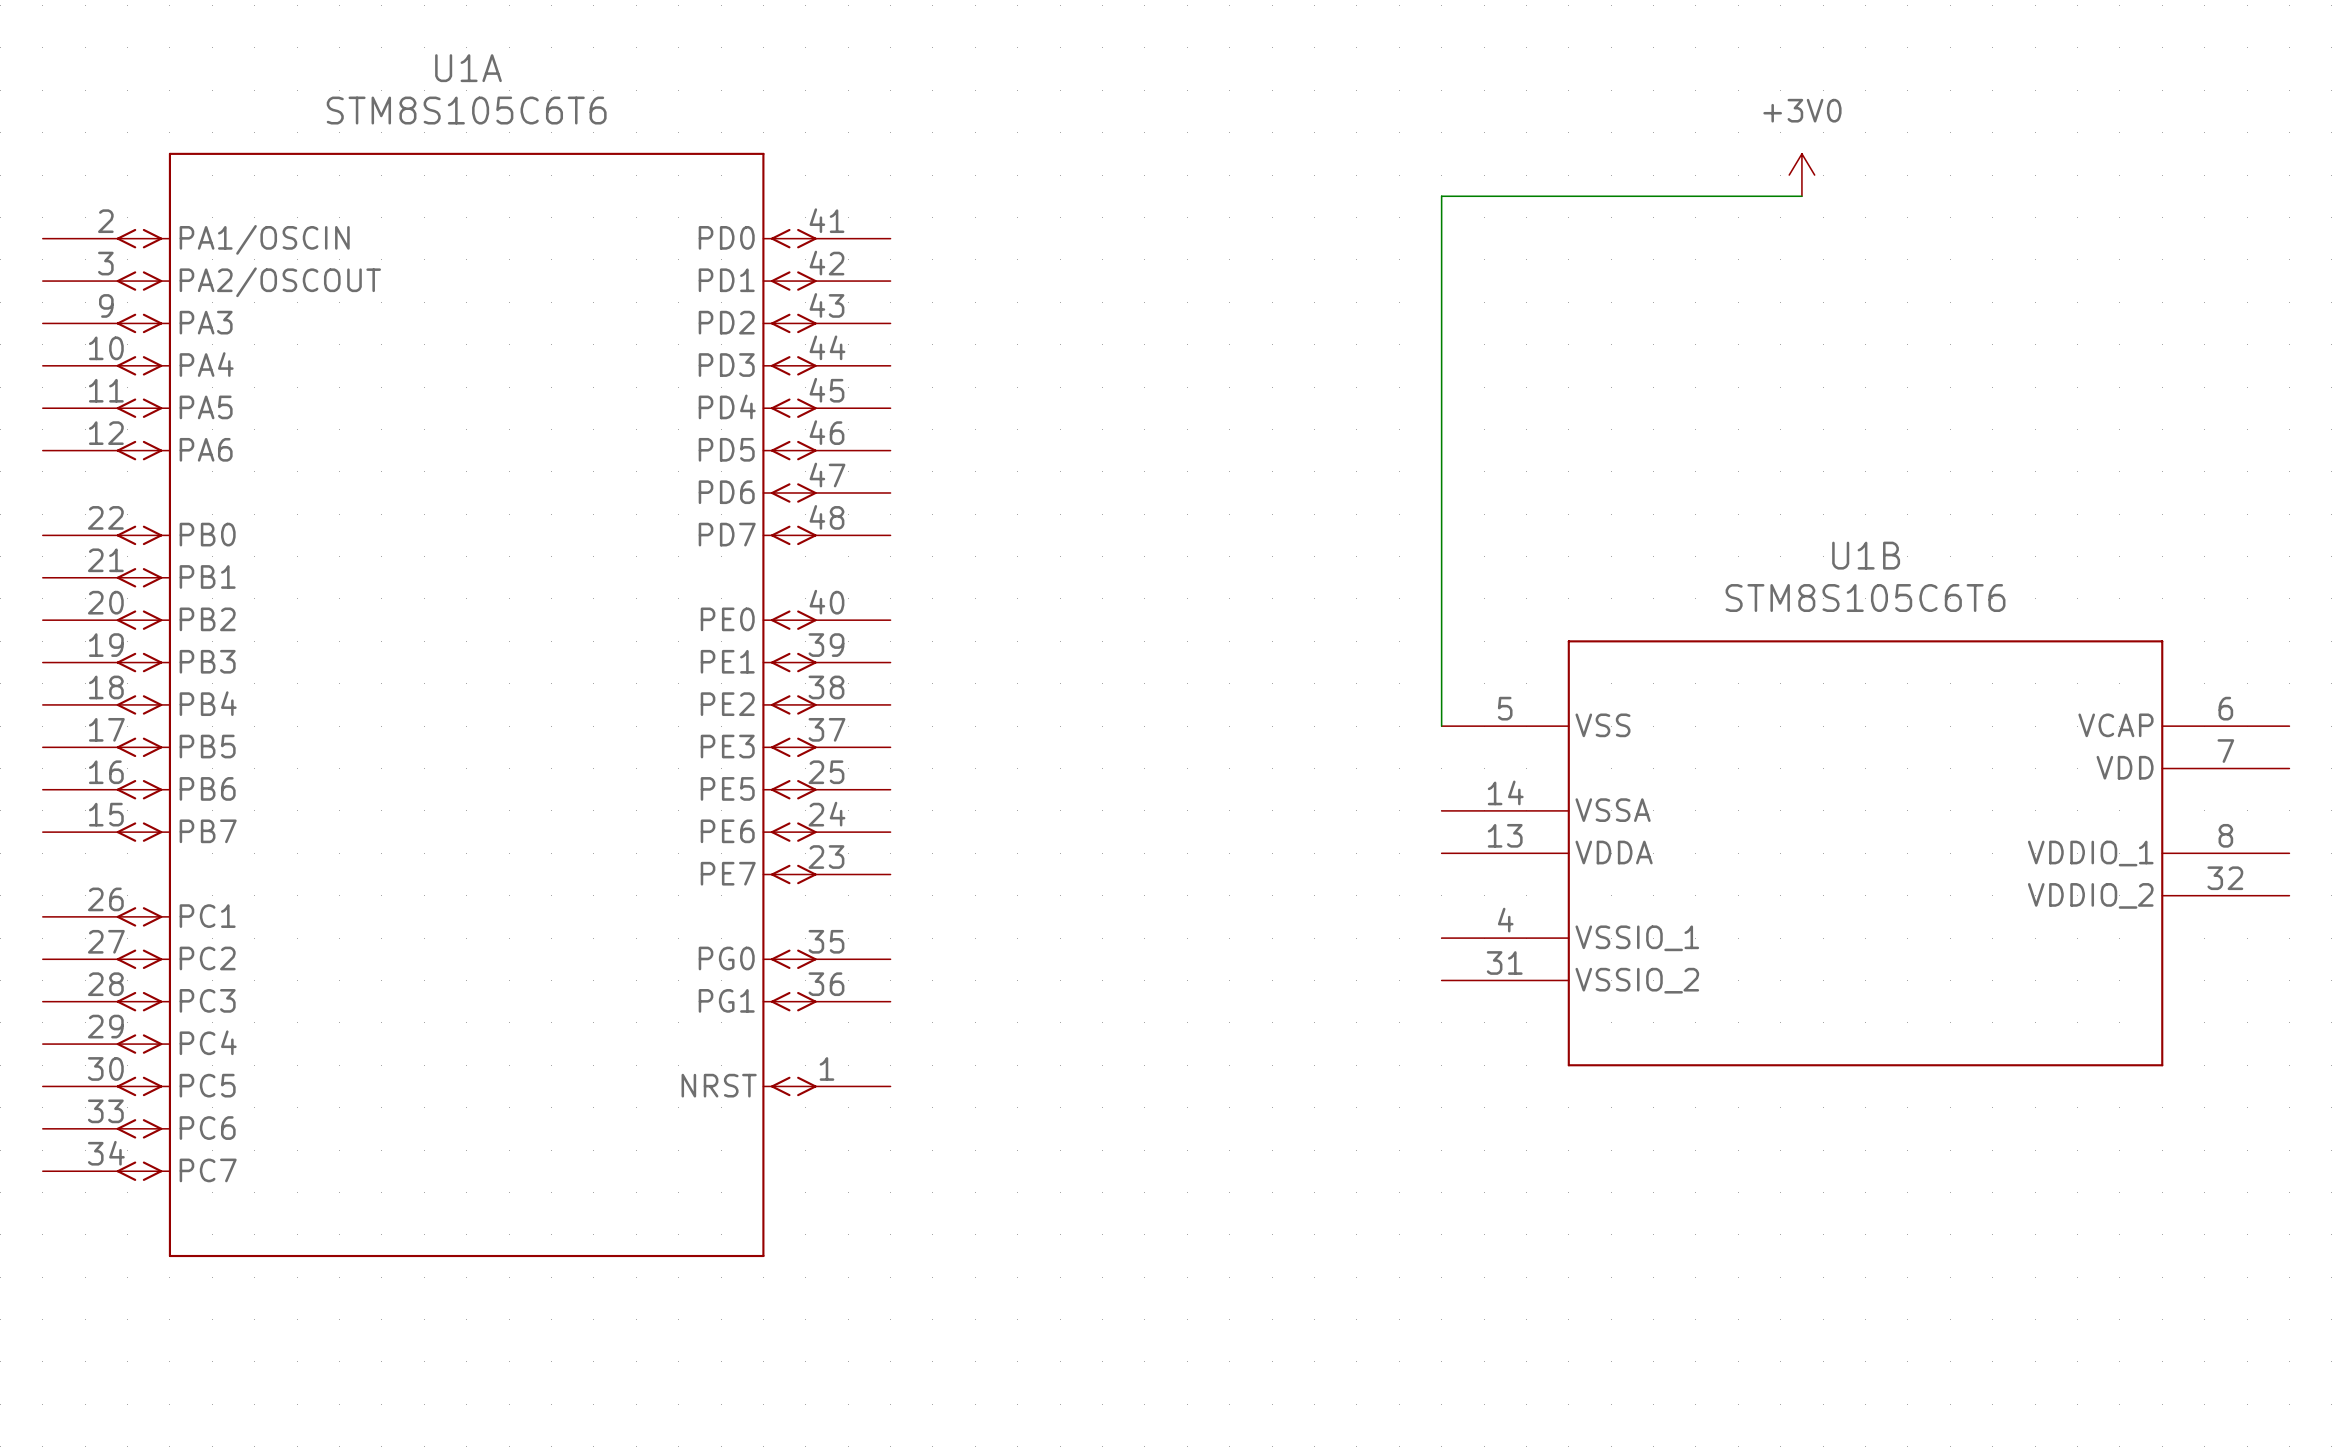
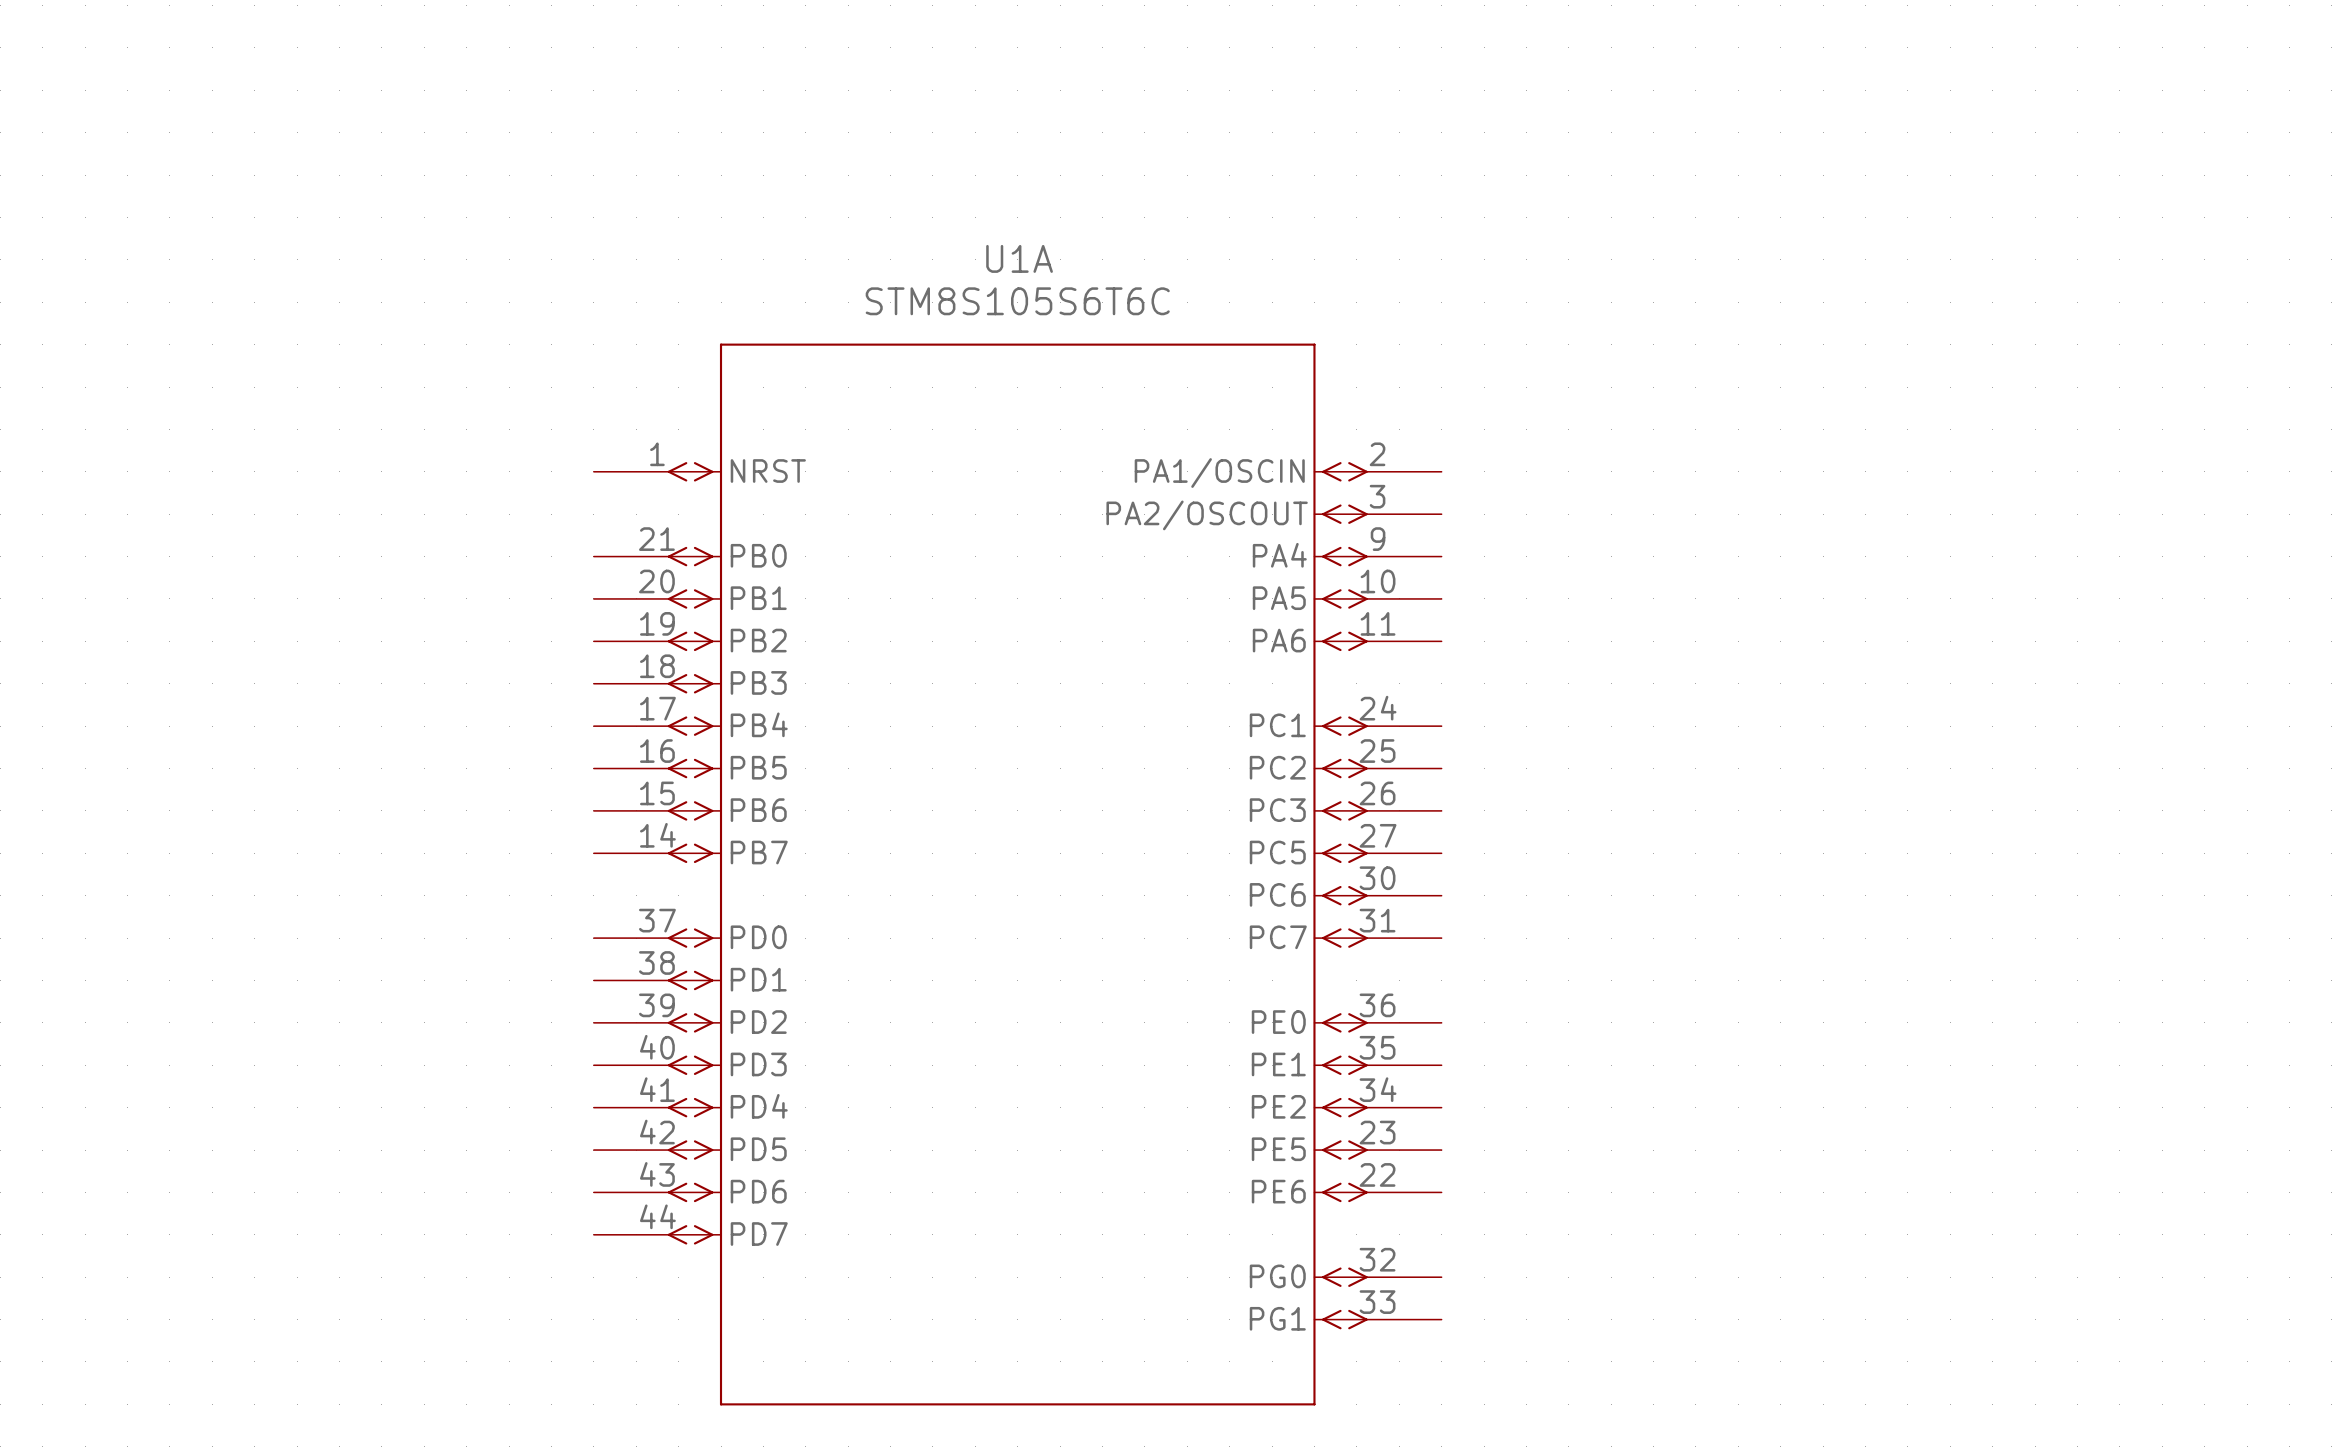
U1A value: STM8S105C6T6 (466, 110) -> STM8S105S6T6C (1017, 301)
U1A symbol: [42, 152, 891, 1258] -> [593, 343, 1442, 1406]
power symbol: +3V0 (1801, 175) -> none
wire: (1801, 196) (1441, 196) (1441, 726) -> none
U1B: STM8S105C6T6 (1865, 853) -> none

